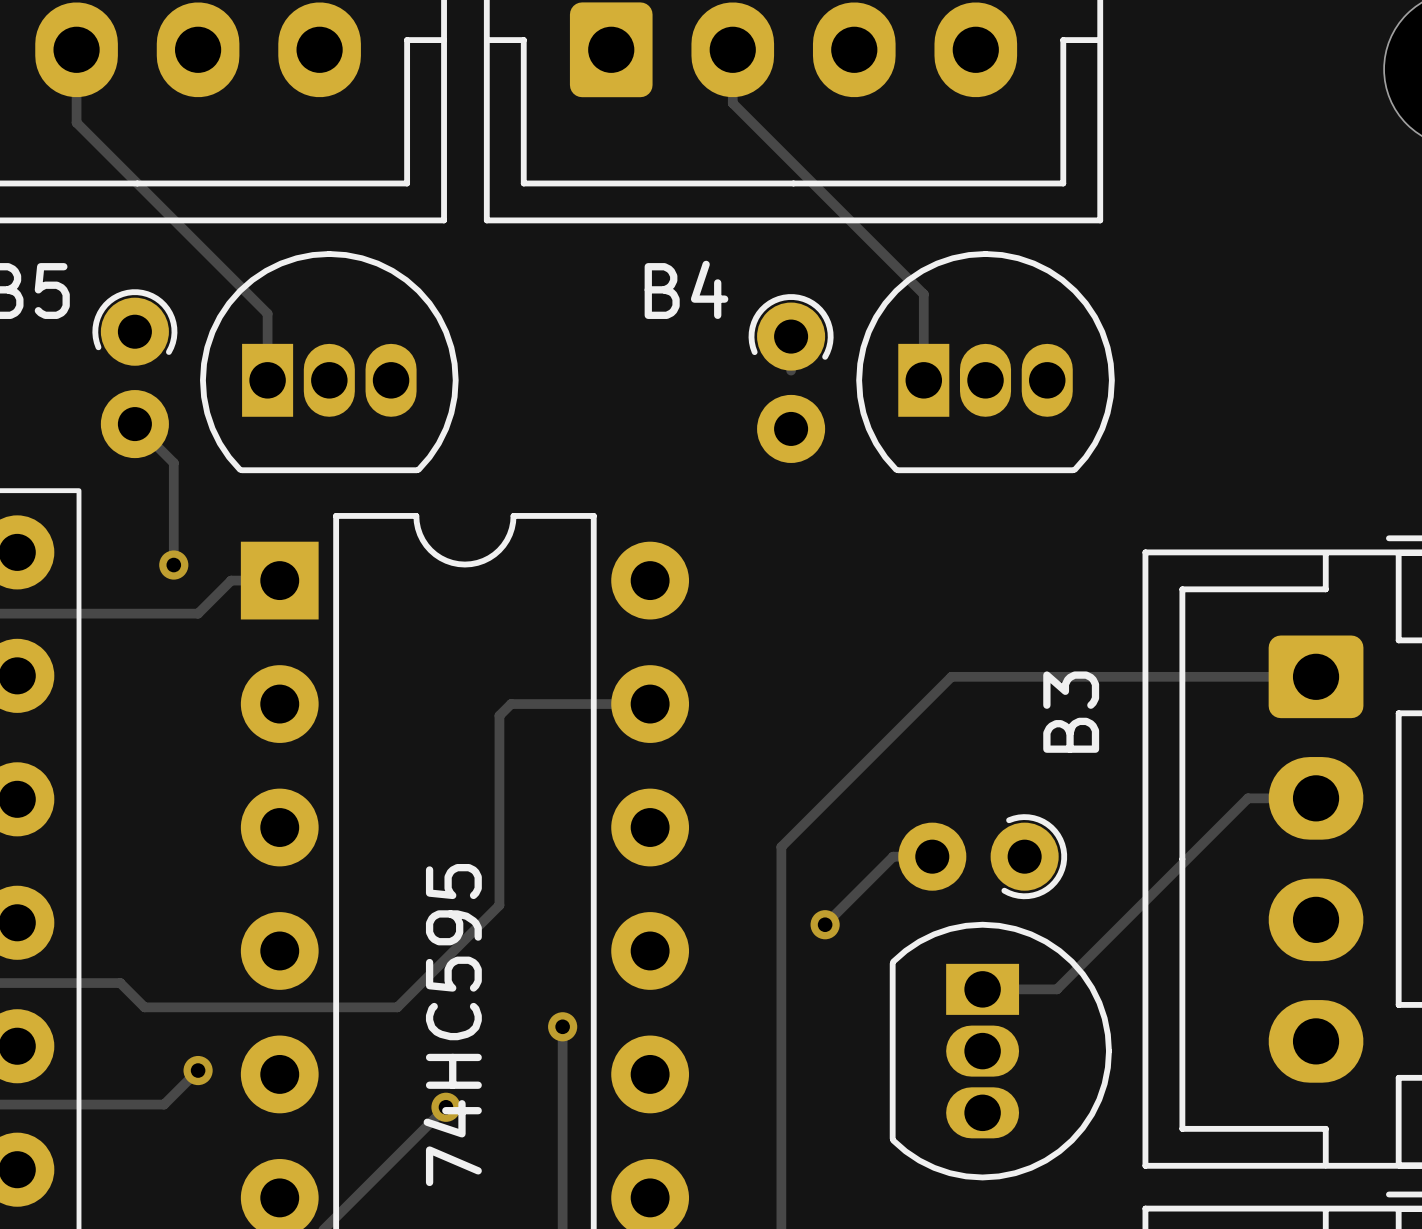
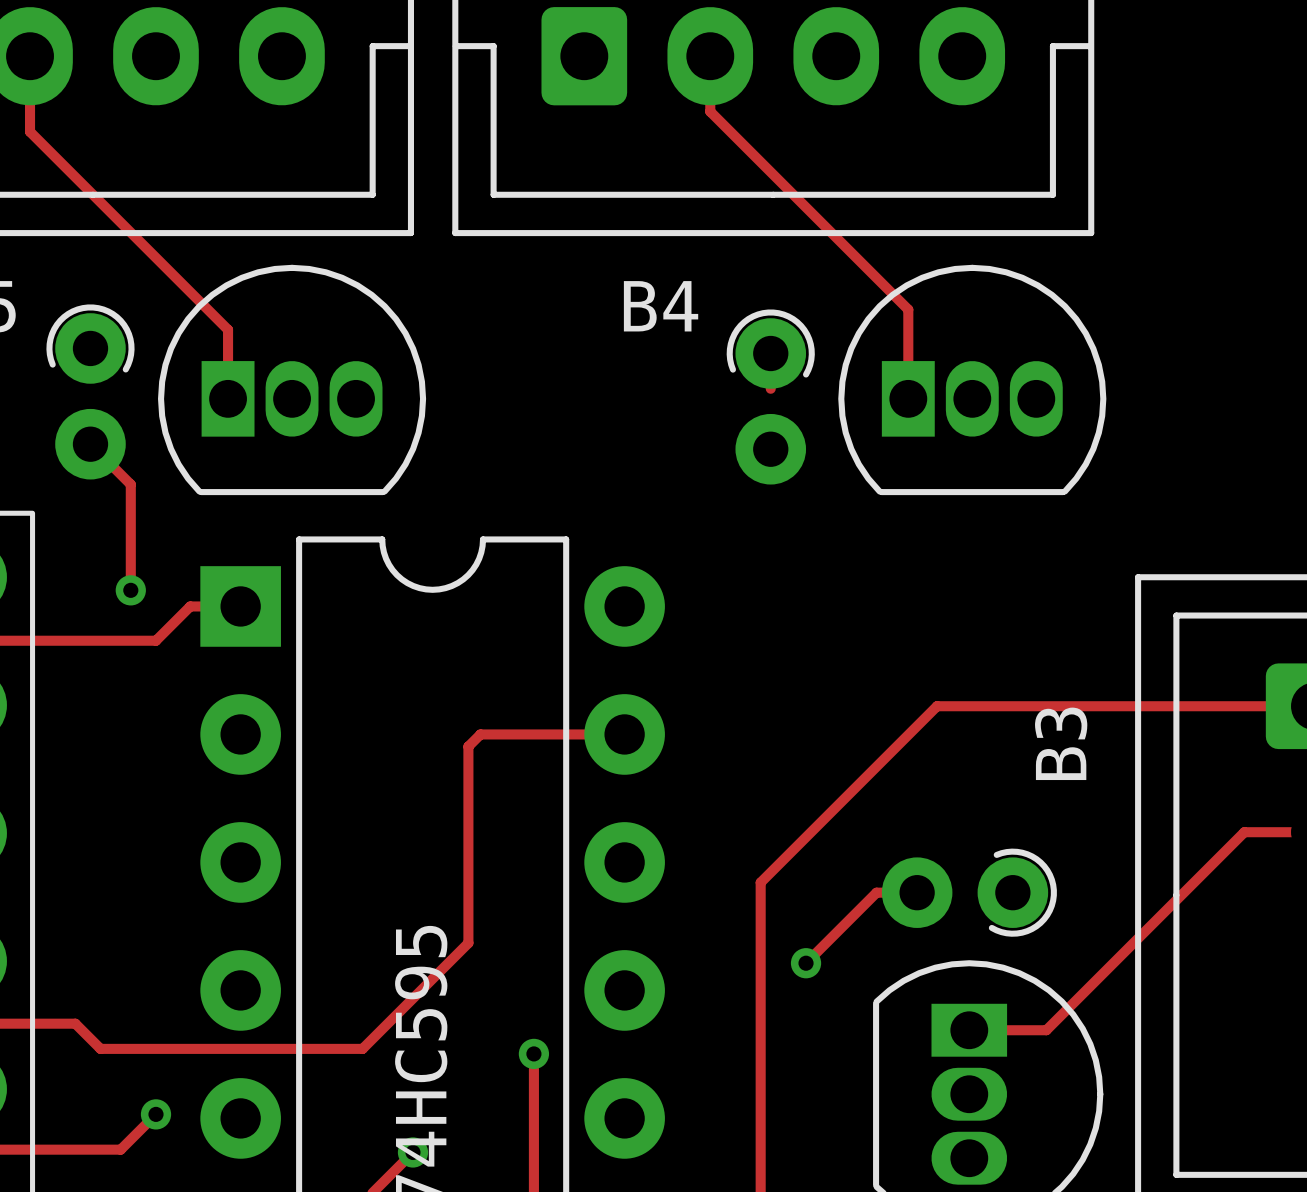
via position: (562, 1026) -> (533, 1053)

